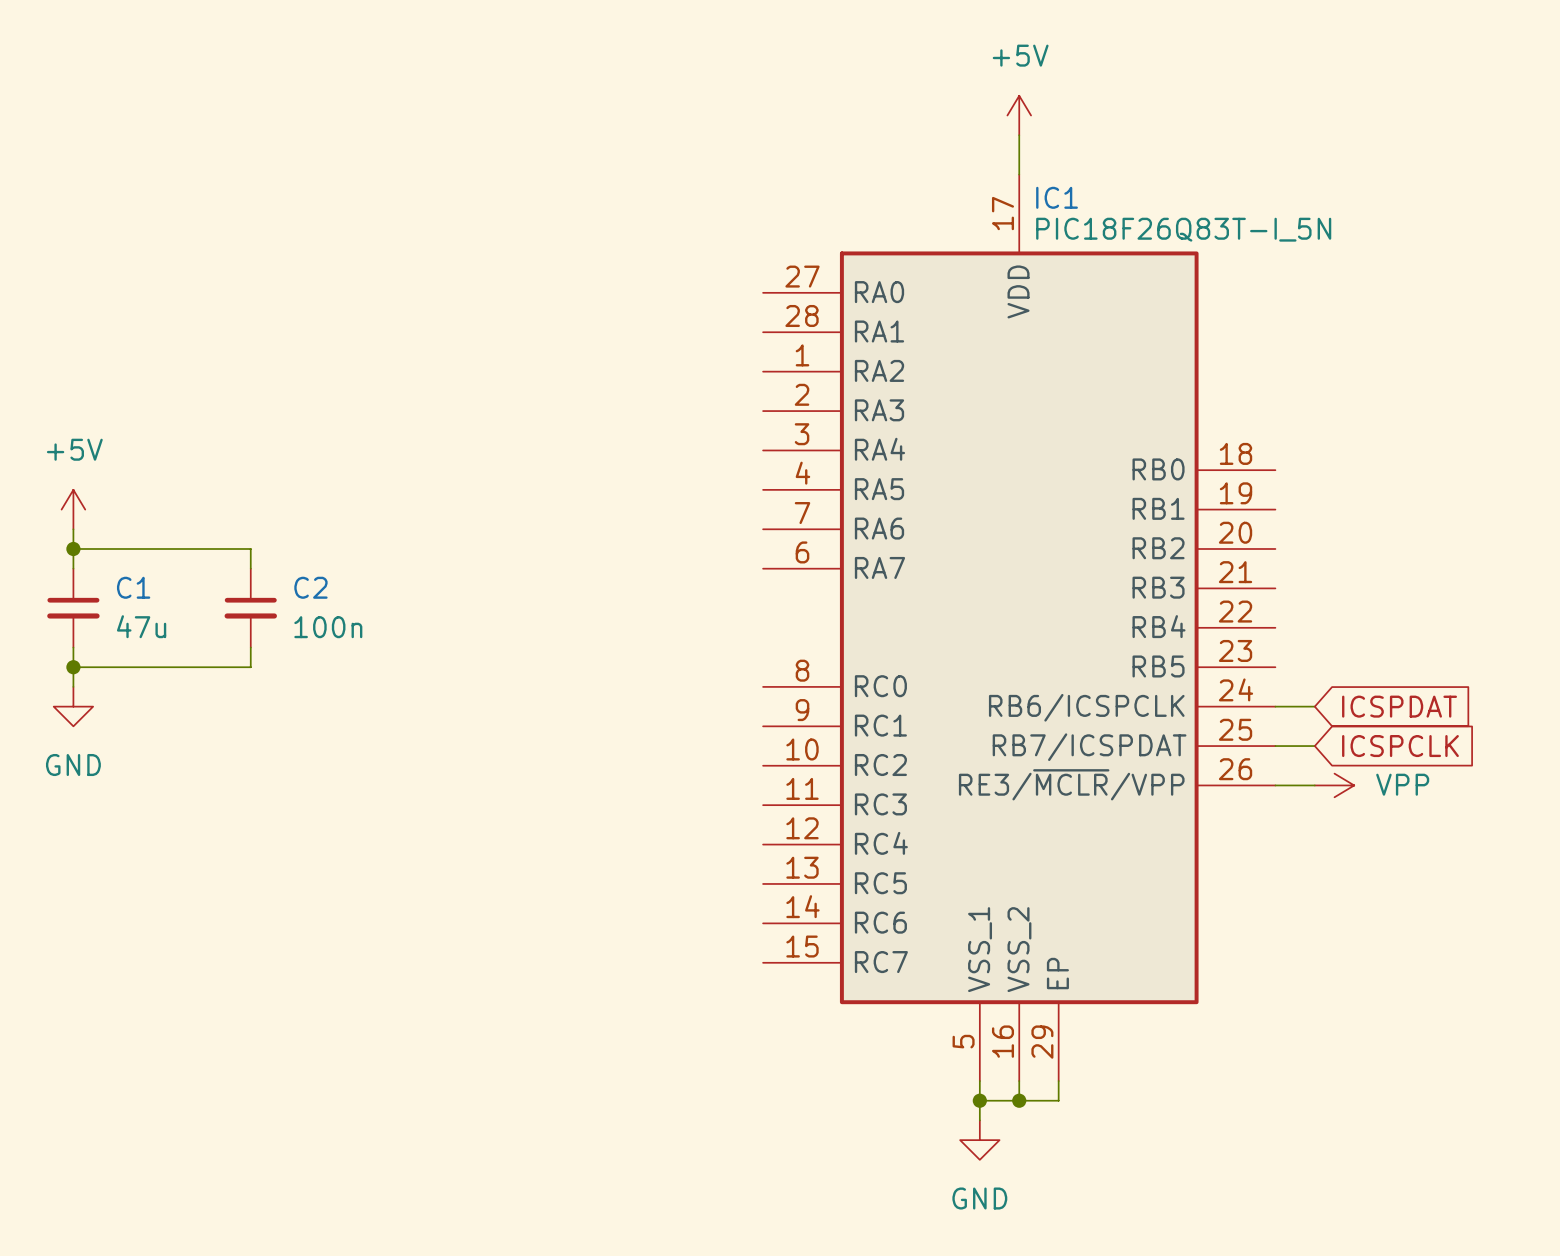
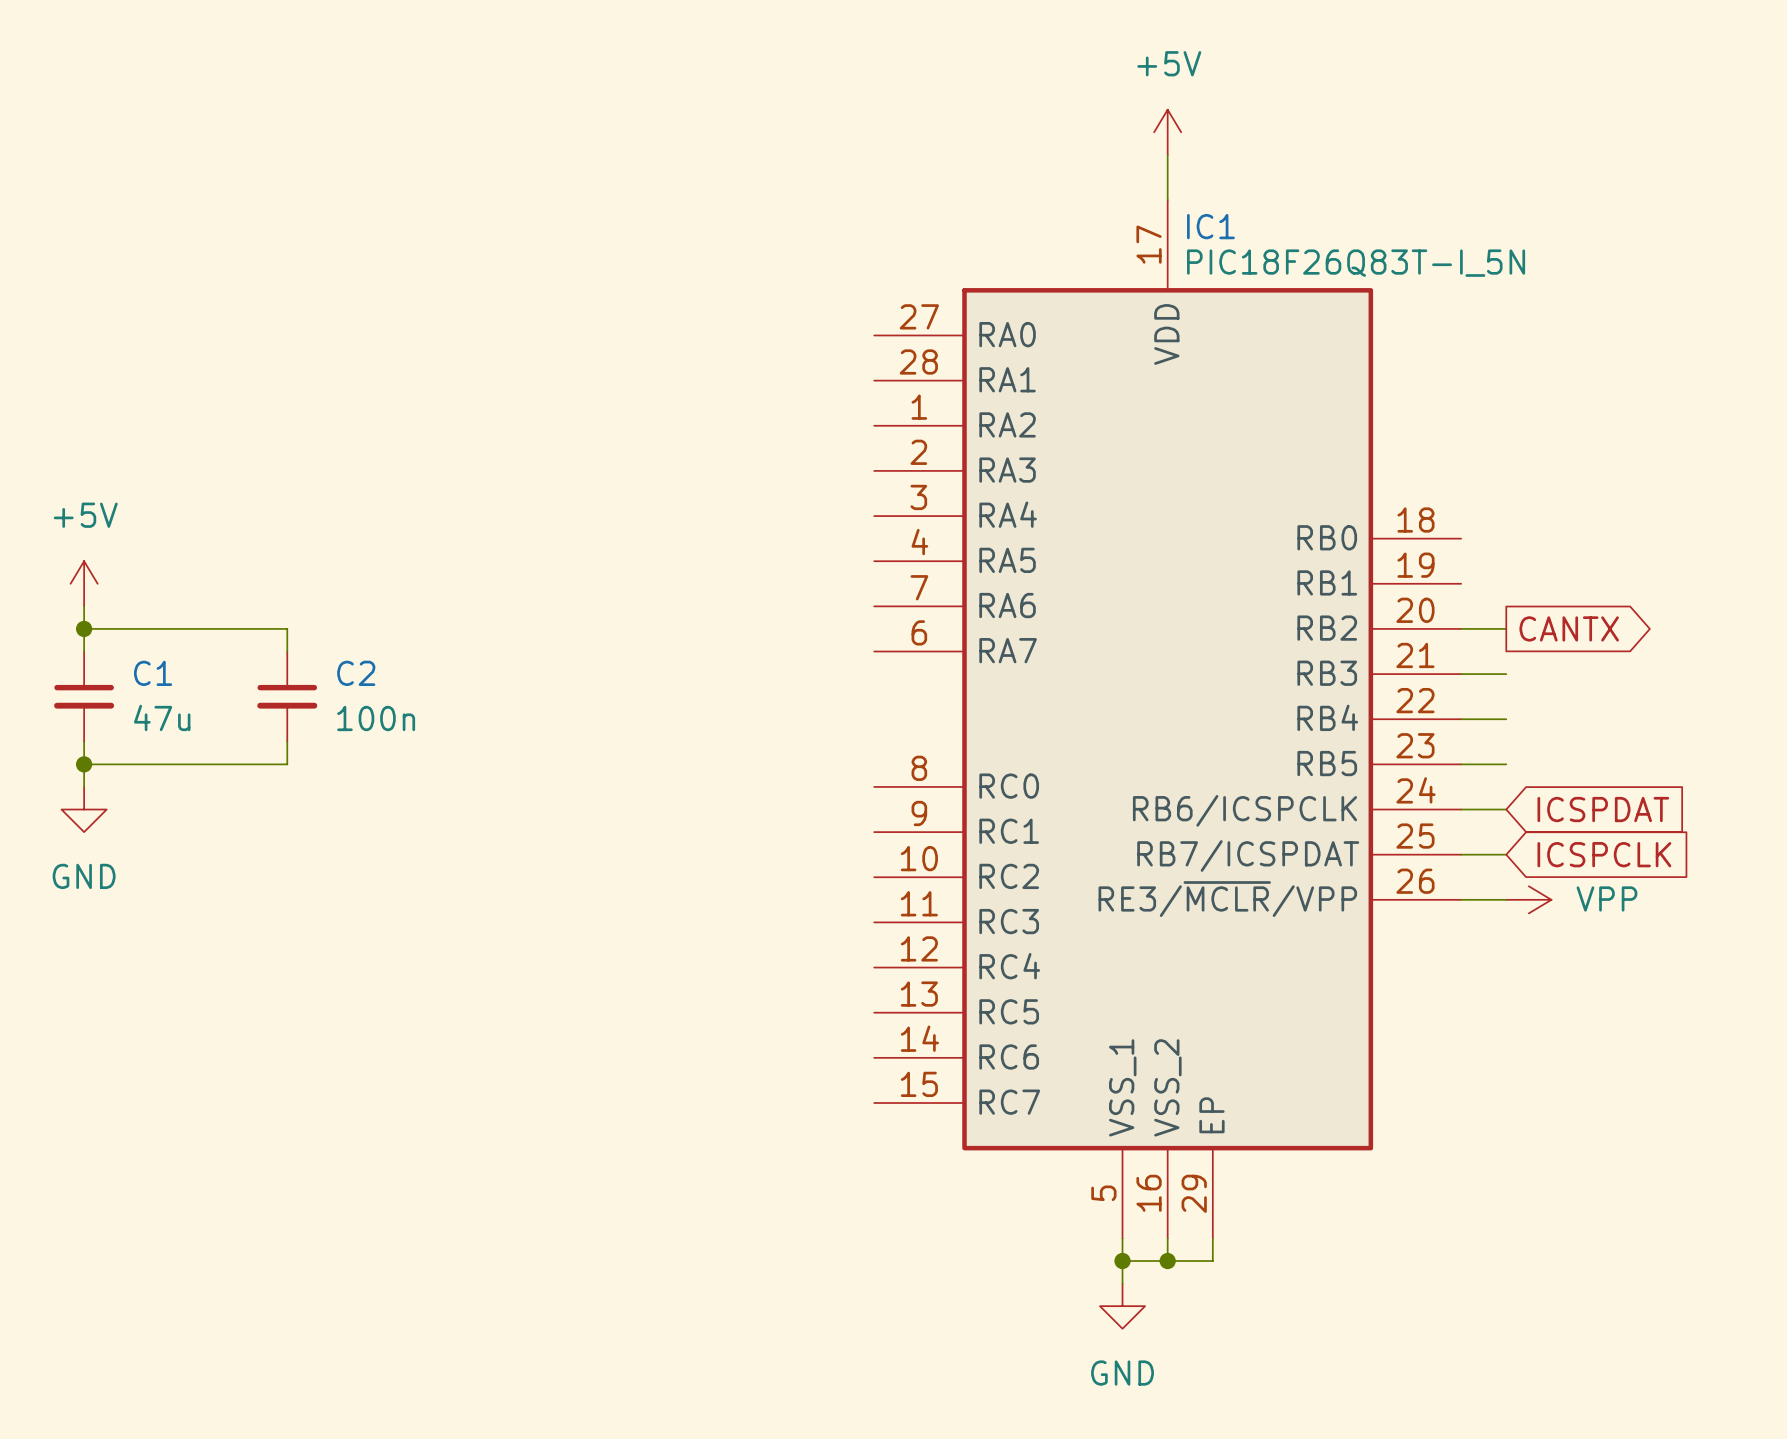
wire: none -> (1461, 628) (1506, 628)
global label: none -> CANTX (1569, 628)
wire: none -> (1461, 674) (1506, 674)
wire: none -> (1461, 719) (1506, 719)
wire: none -> (1461, 764) (1506, 764)

